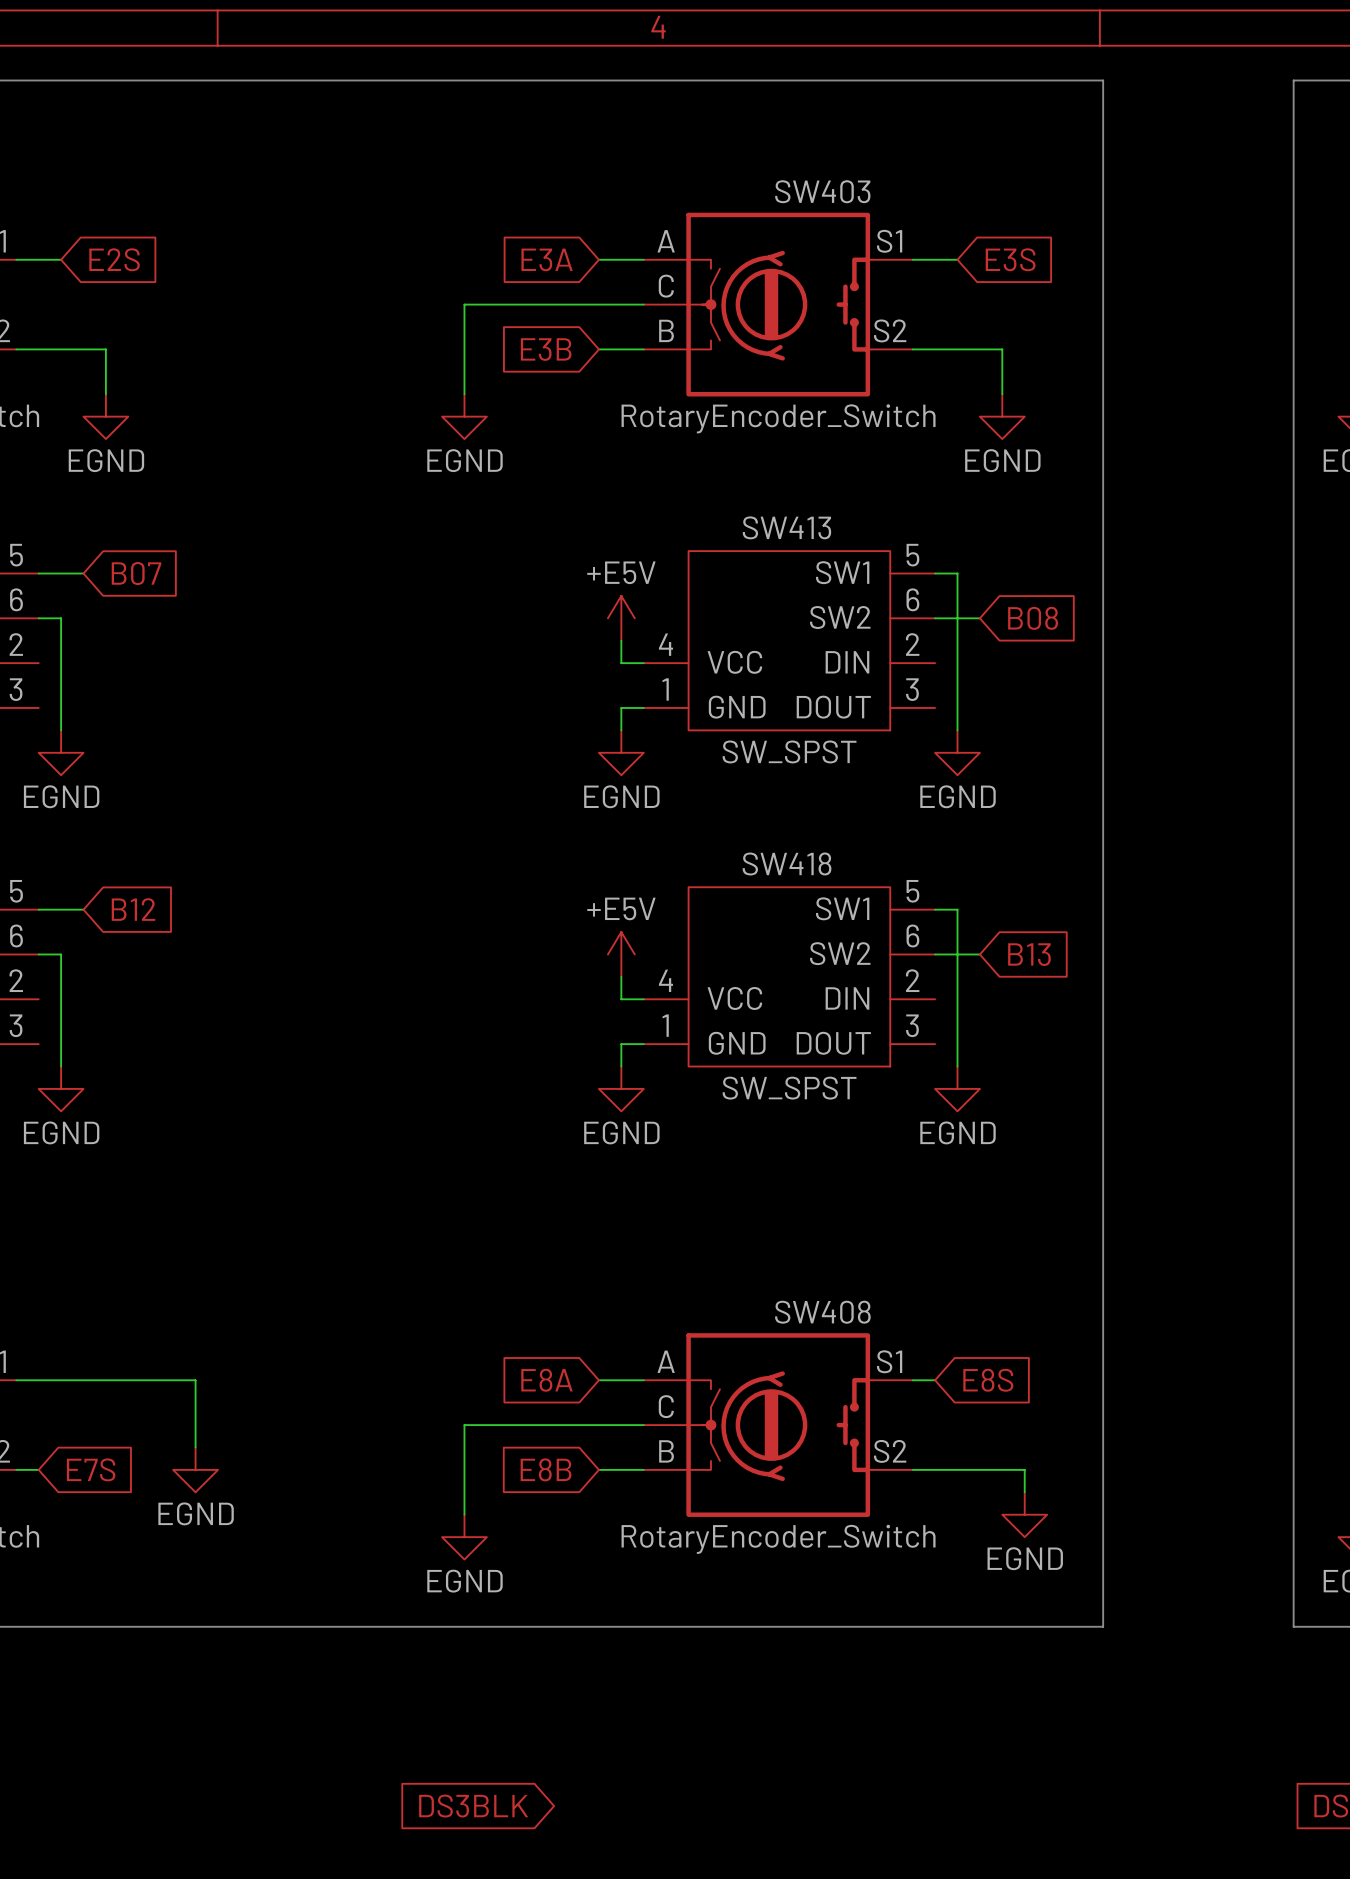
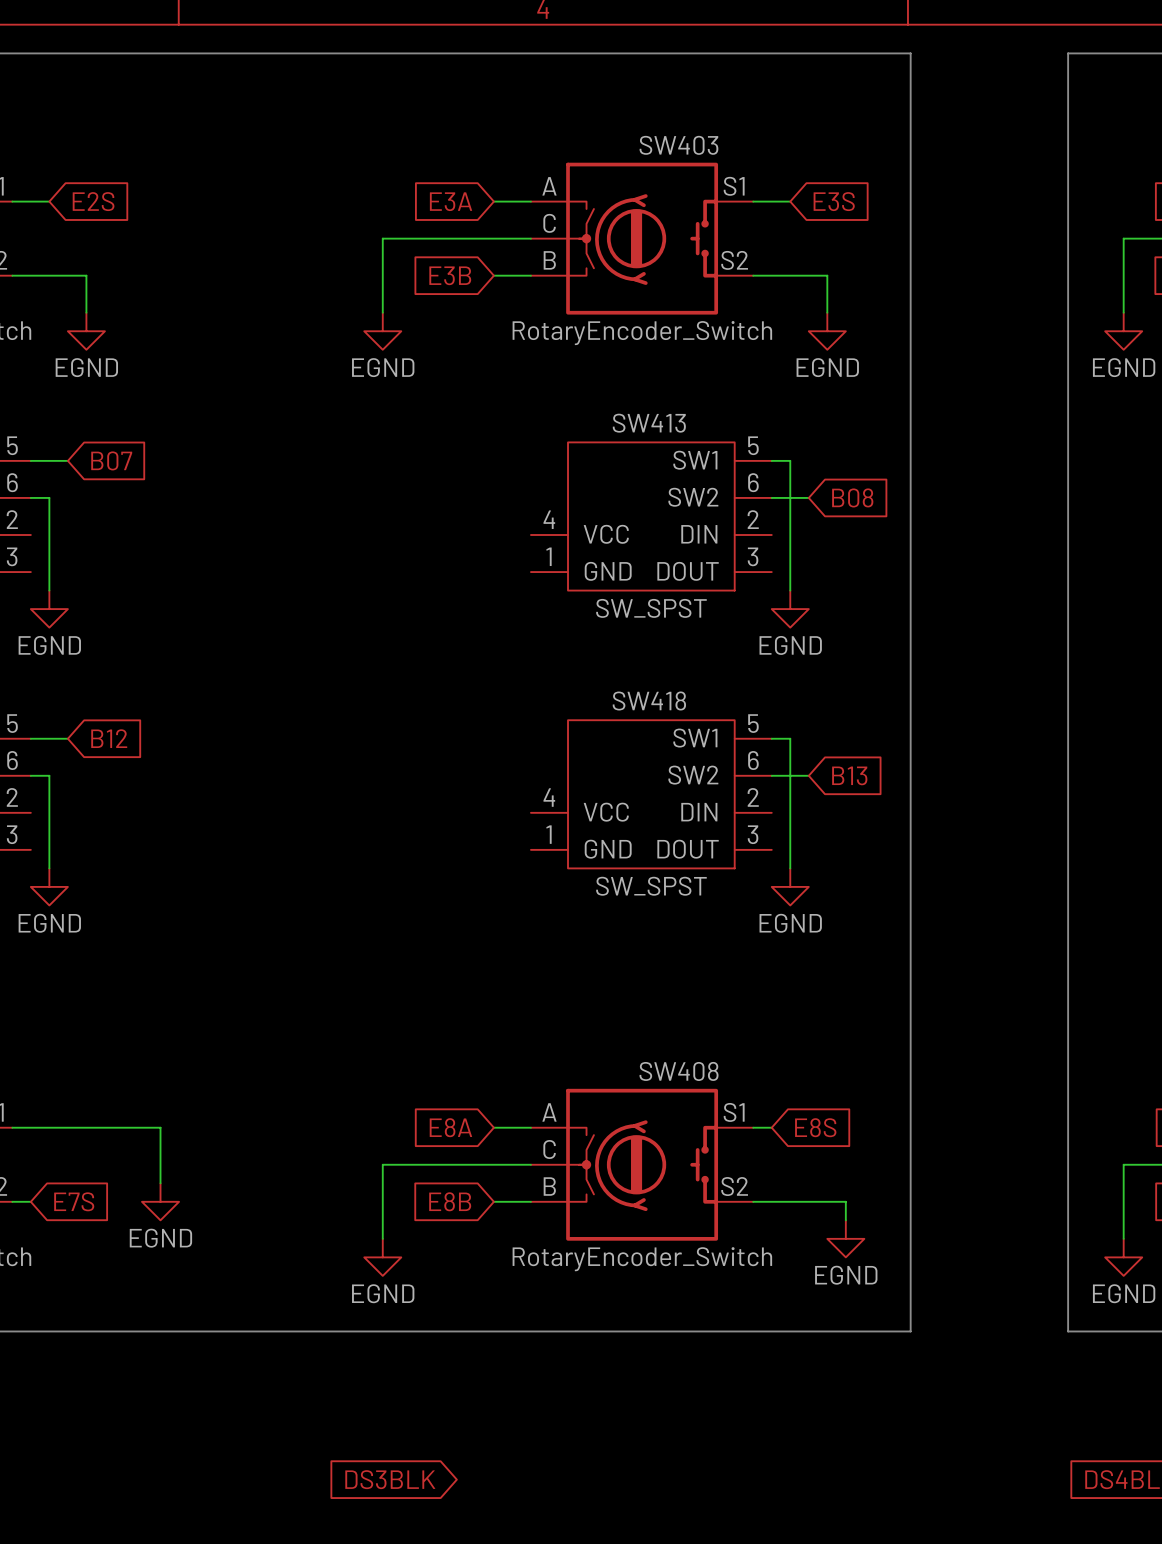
power symbol: +E5V (621, 618) -> none
wire: (621, 640) (621, 663) (643, 663) -> none
wire: (643, 707) (621, 707) (621, 730) -> none
power symbol: EGND (621, 752) -> none
power symbol: +E5V (621, 954) -> none
wire: (621, 976) (621, 999) (643, 999) -> none
wire: (643, 1044) (621, 1044) (621, 1066) -> none
power symbol: EGND (621, 1088) -> none

